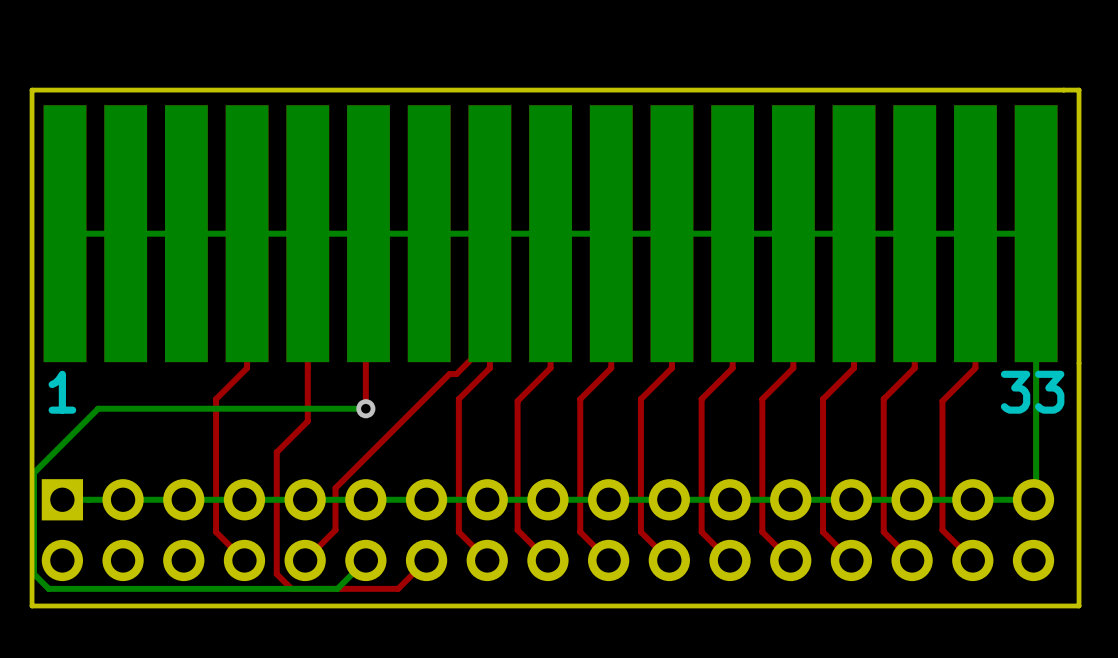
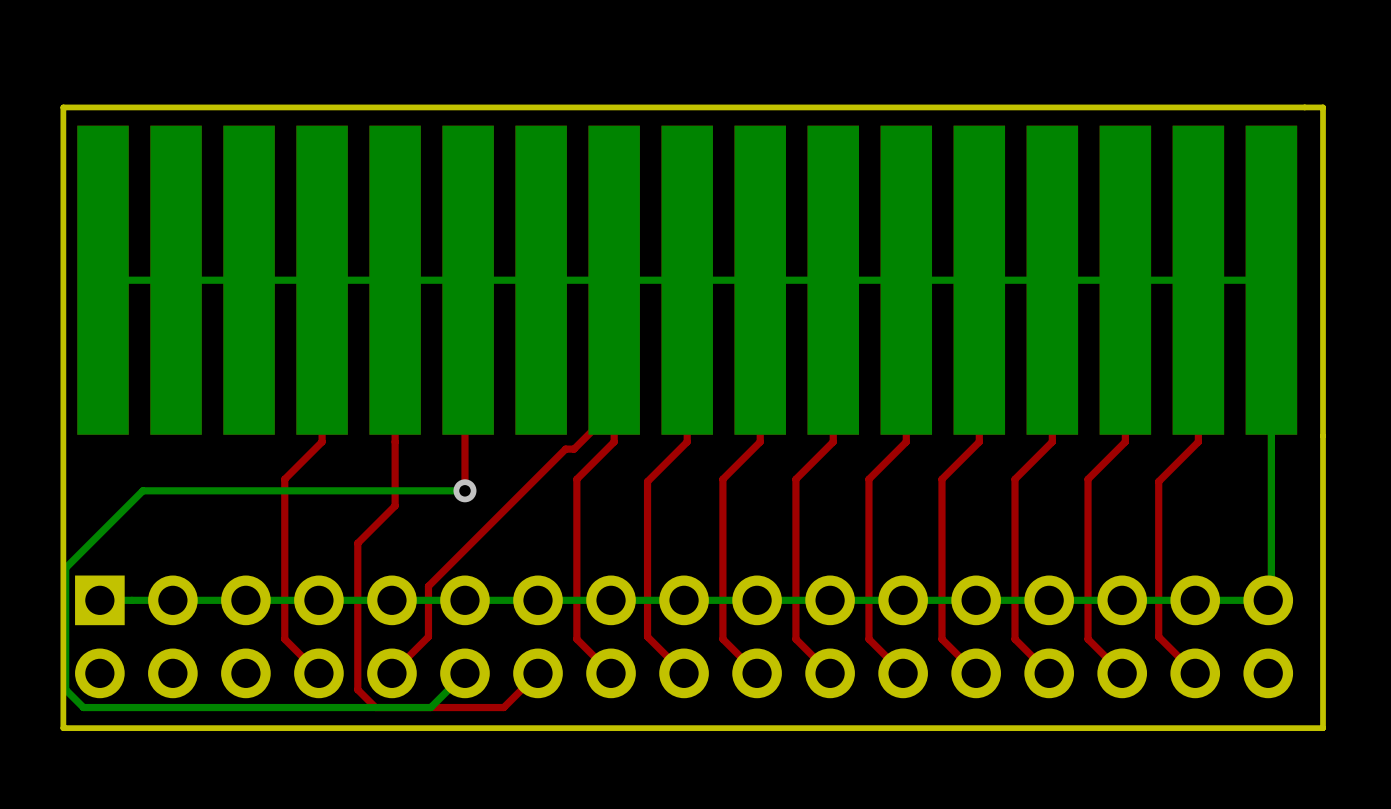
text: 1 (62, 392) -> none
text: 33 (1032, 392) -> none

